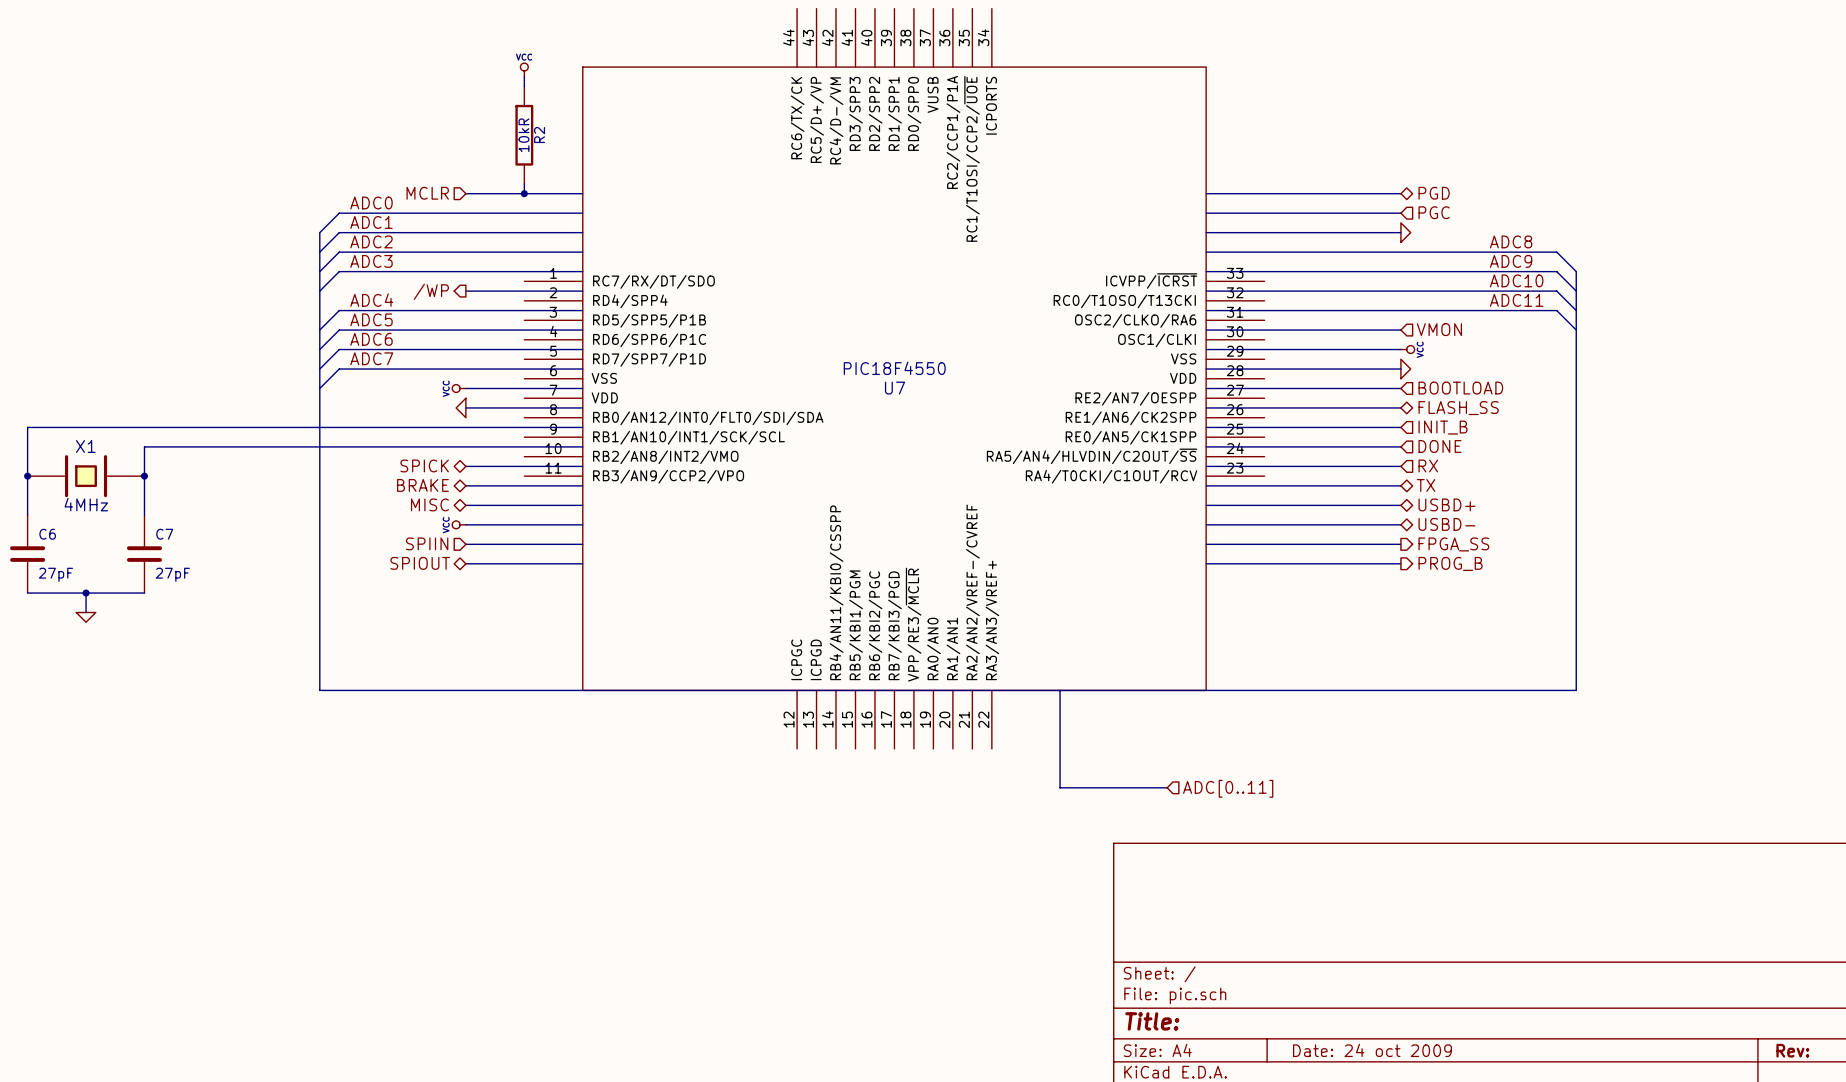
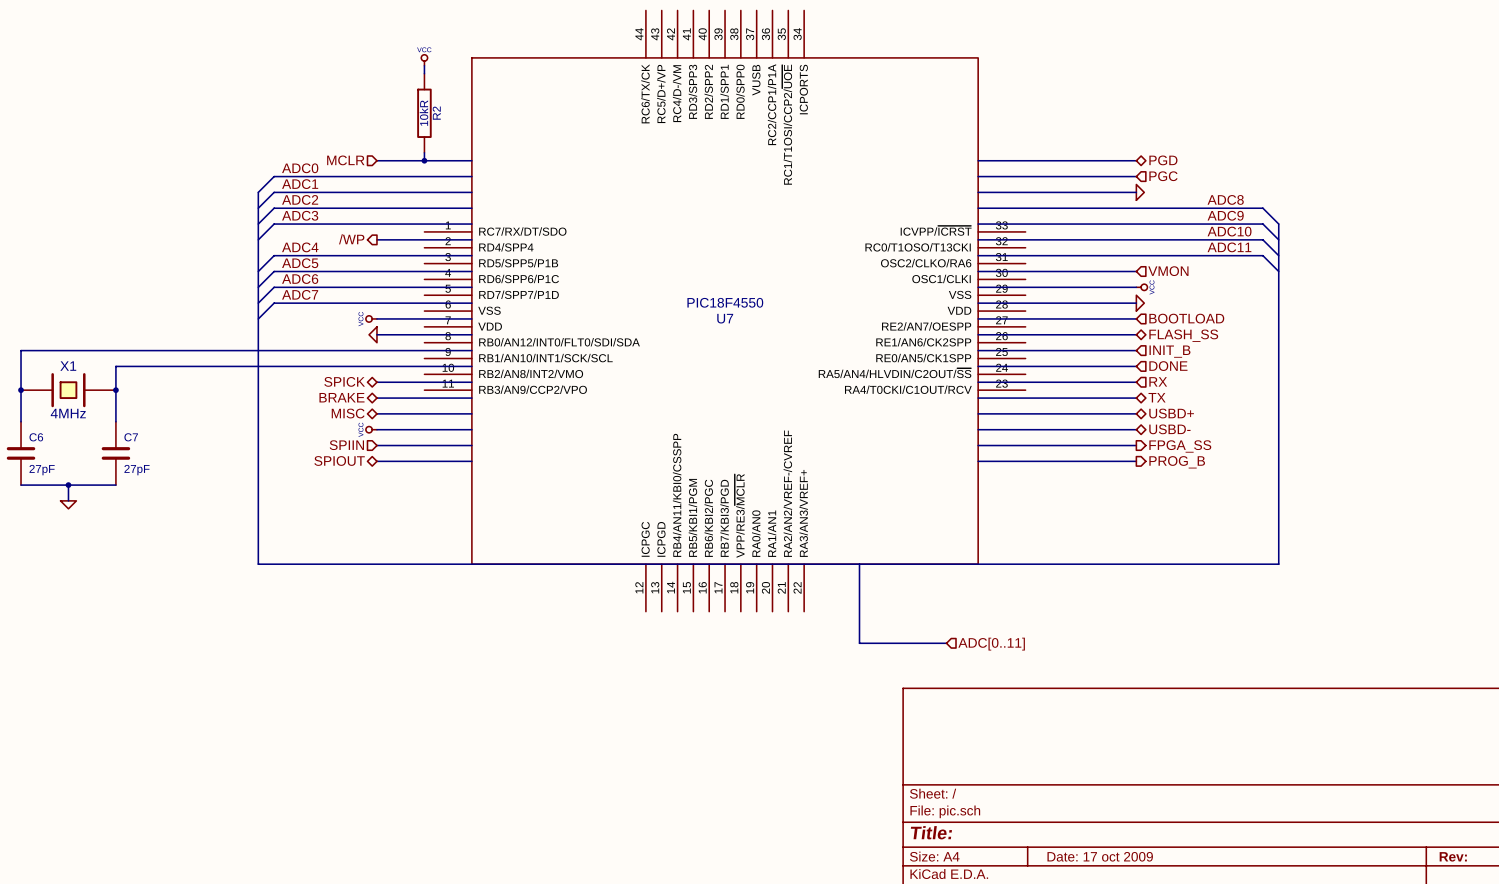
title block: Date: 24 oct 2009 (1372, 1050) -> Date: 17 oct 2009 (1100, 856)

